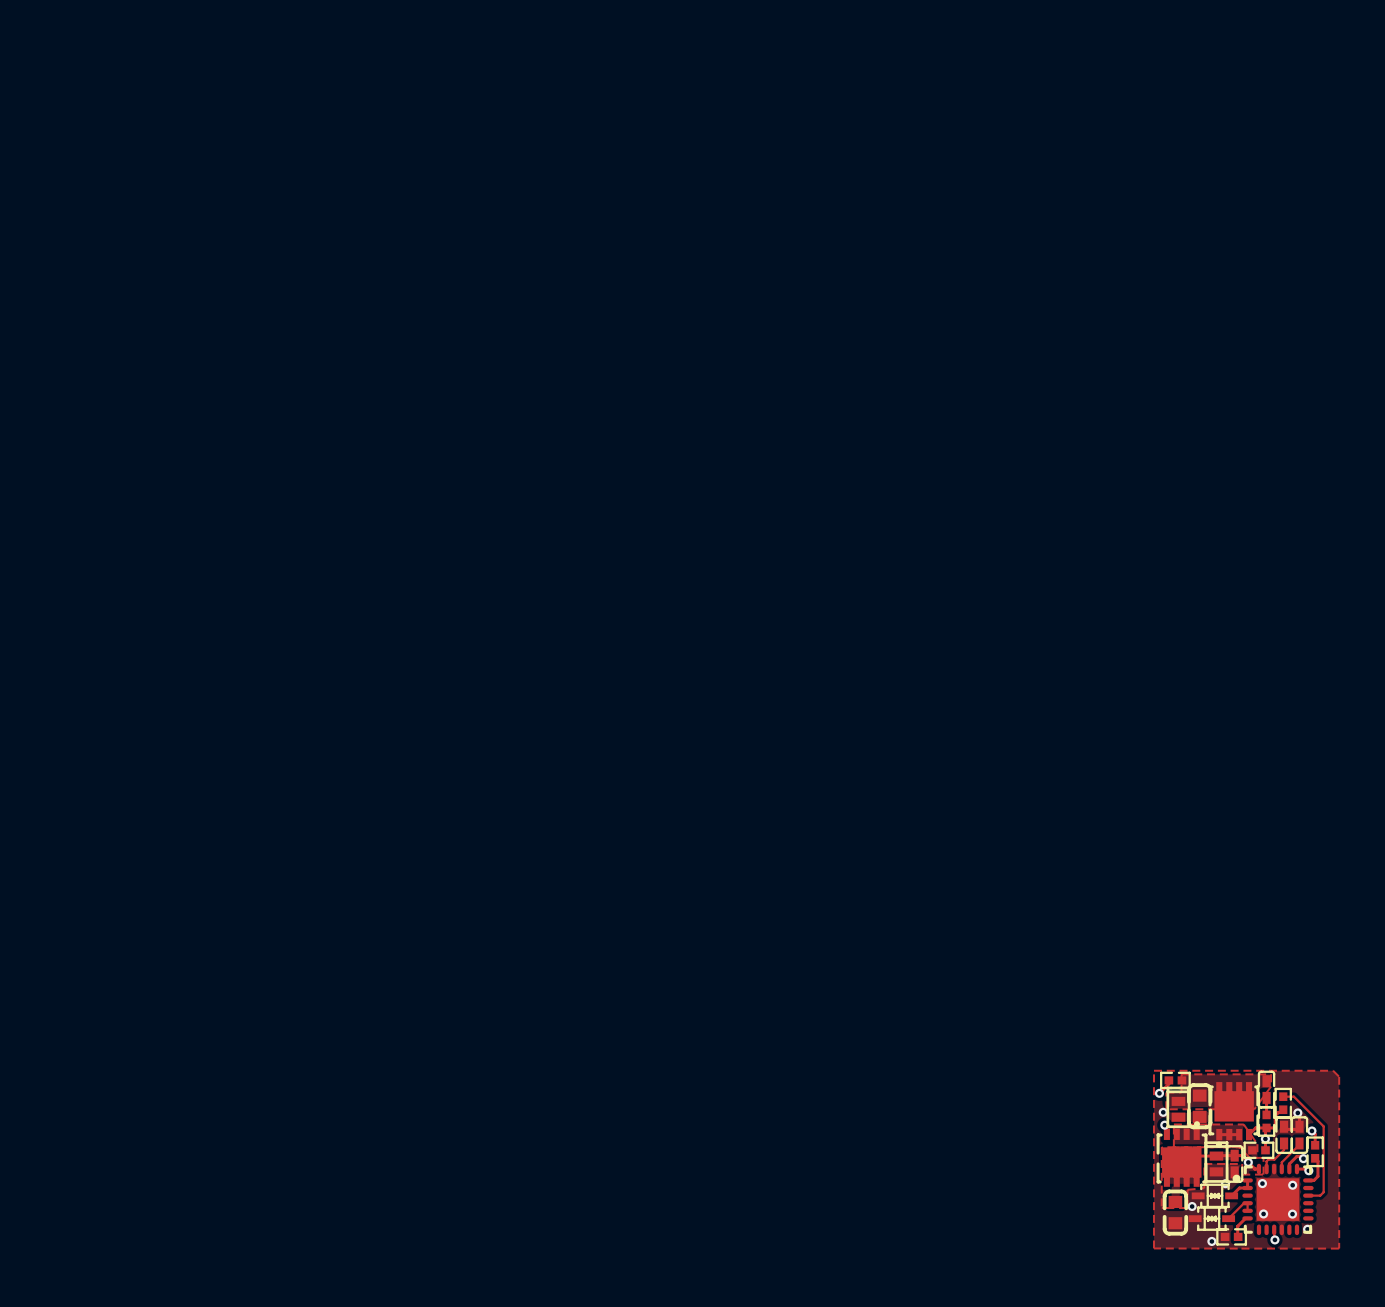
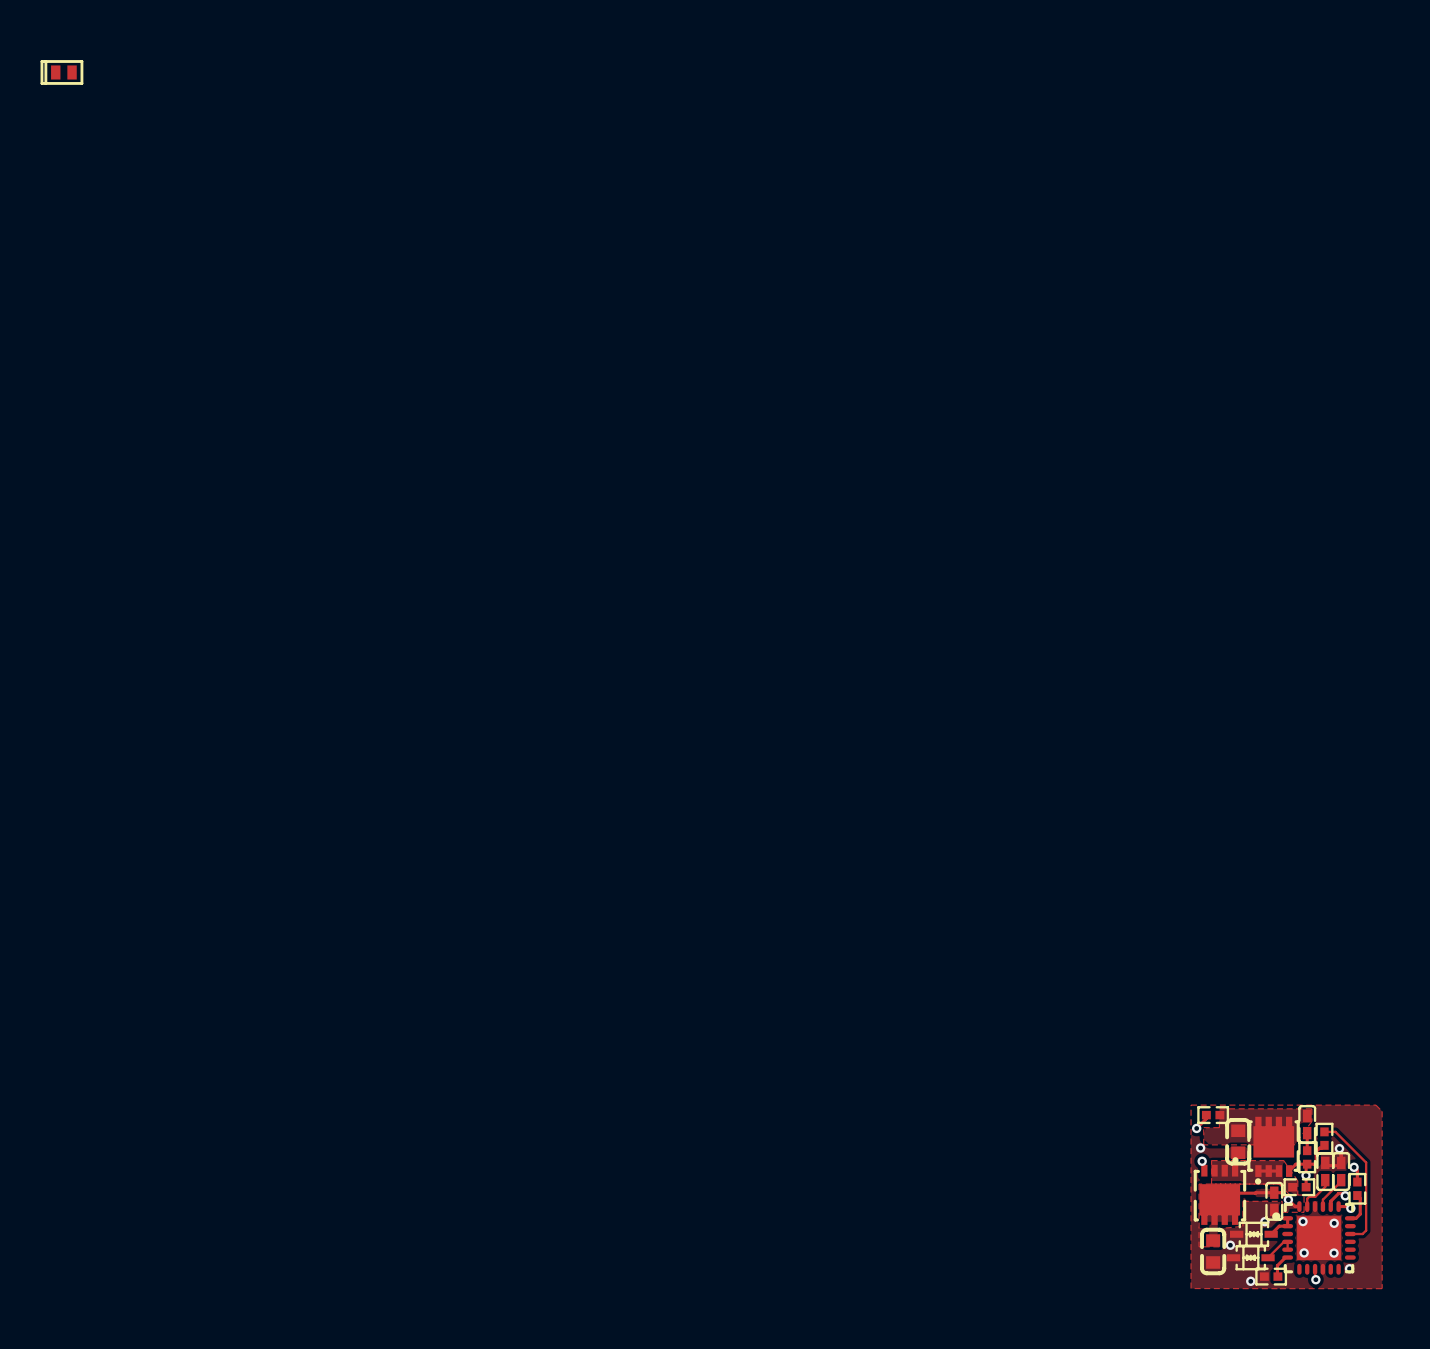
part: none -> (61, 72)
part: (1178, 1107) -> none
part: (1216, 1162) -> none

